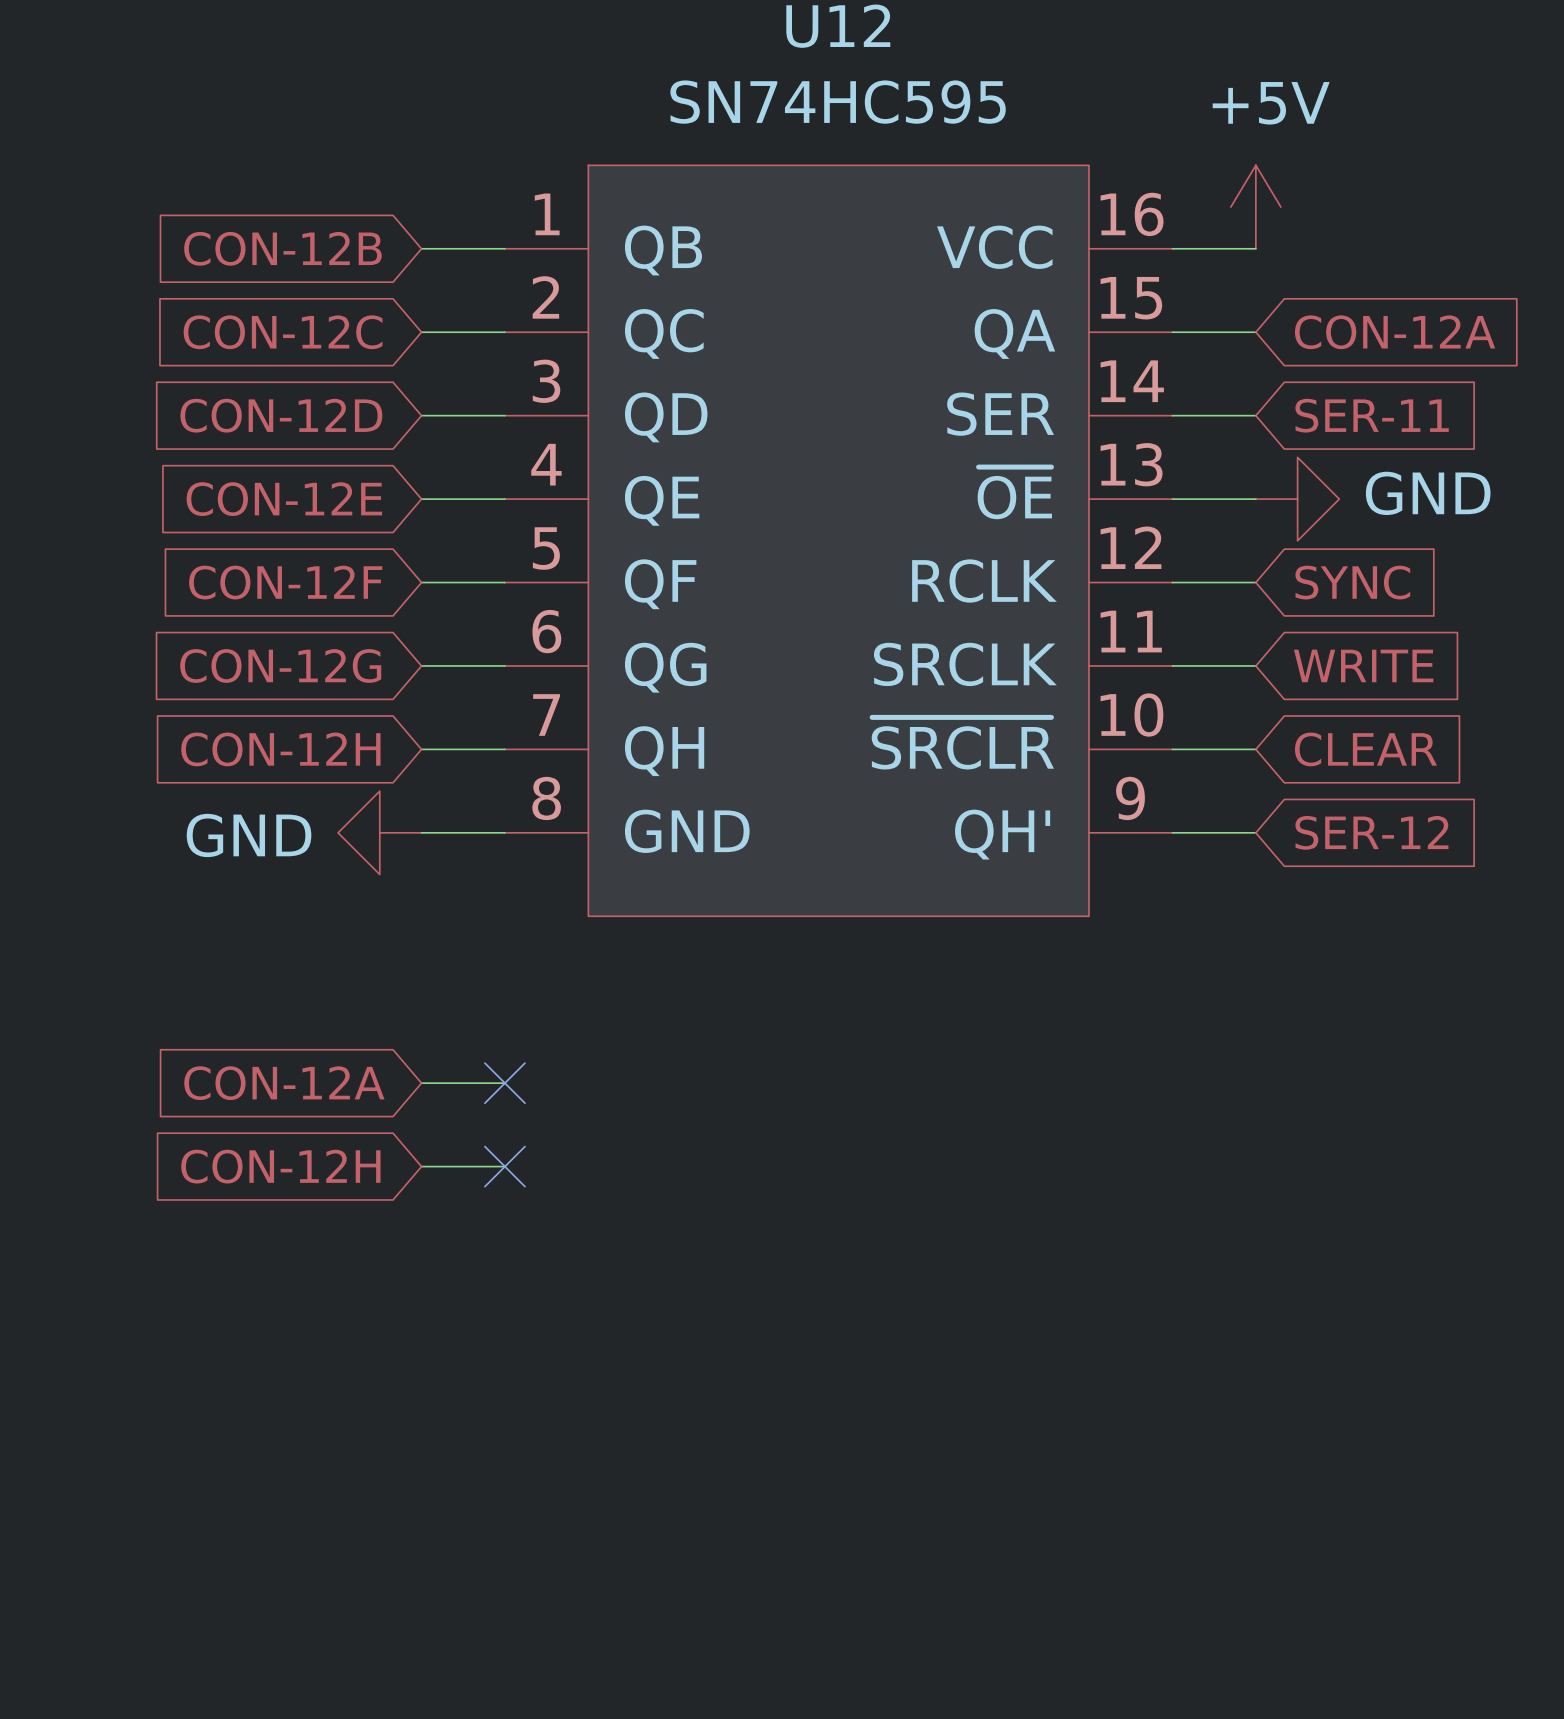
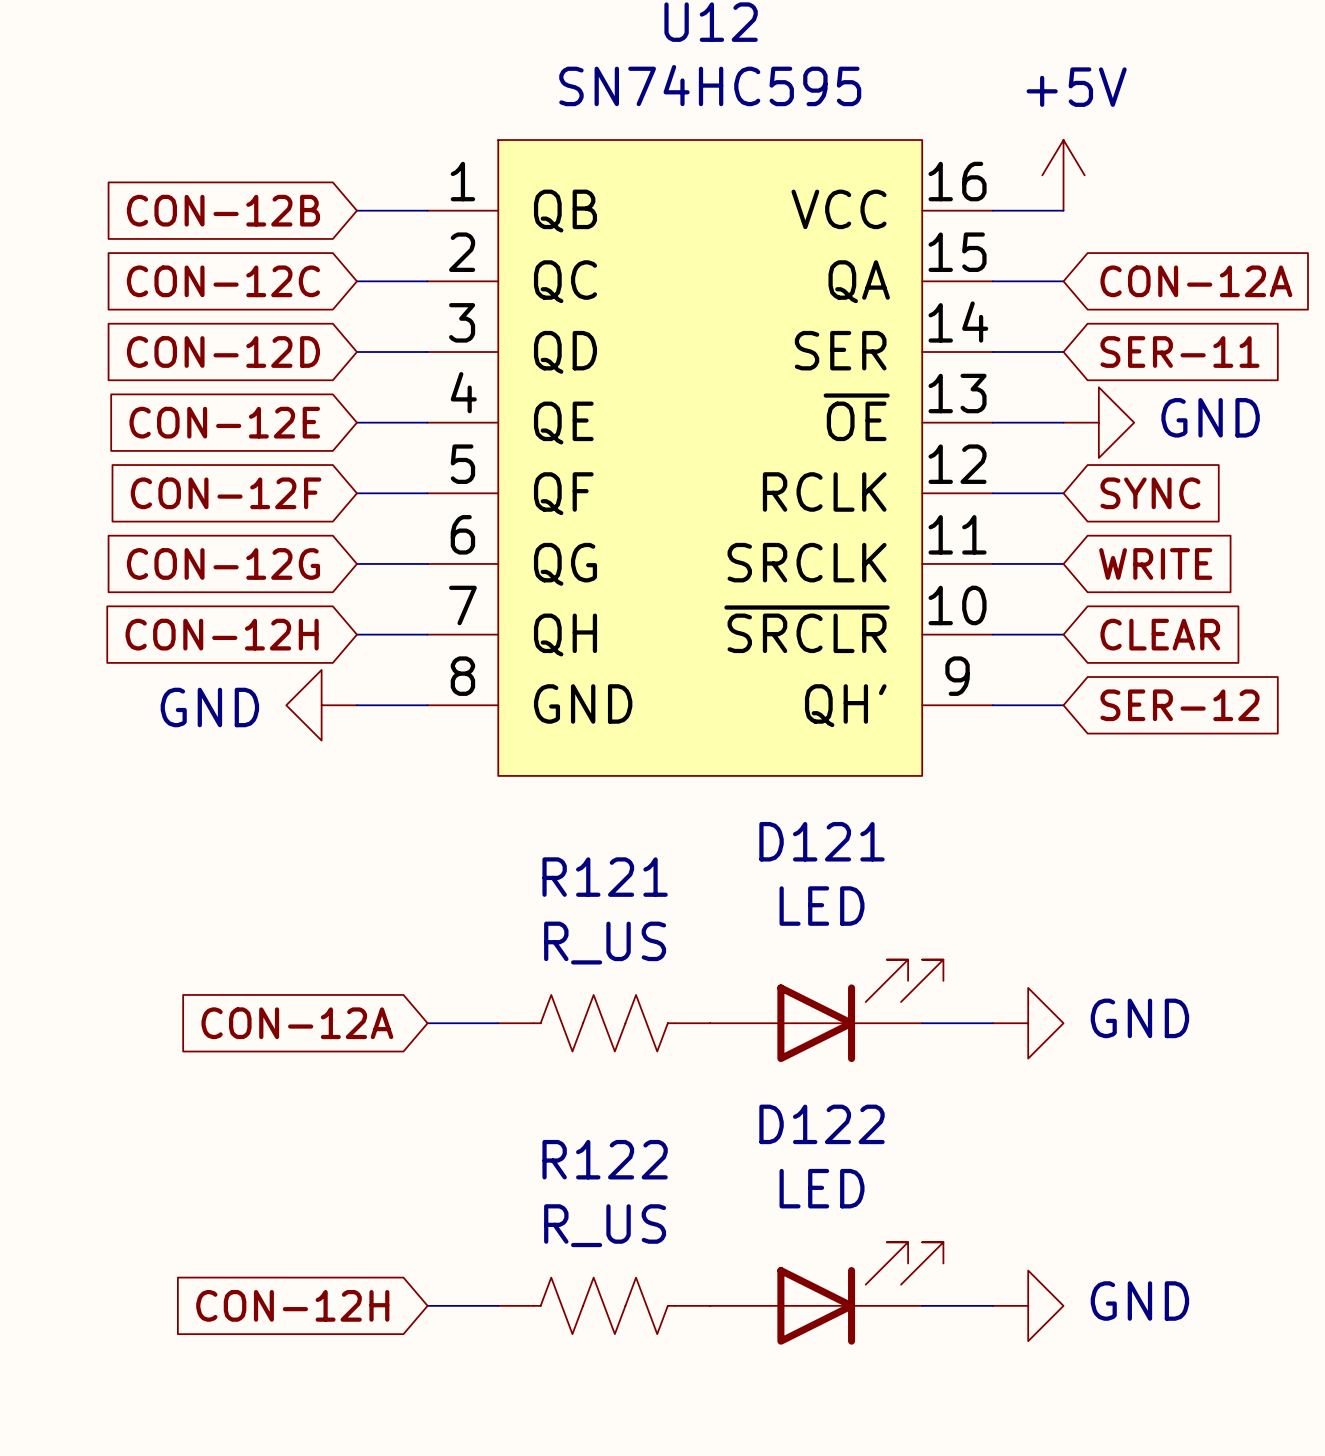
global label position: CON-12A (284, 1083) -> CON-12A (297, 1023)
wire: (421, 1083) (504, 1083) -> (427, 1305) (498, 1305)
no-connect mark: (504, 1083) -> none
global label position: CON-12H (280, 1166) -> CON-12H (292, 1305)
wire: (421, 1166) (504, 1166) -> (427, 1023) (498, 1023)
no-connect mark: (504, 1166) -> none
D121: none -> LED (826, 1010)
R121: none -> R_US (604, 1023)
wire: none -> (922, 1023) (992, 1023)
power symbol: none -> GND (1028, 1023)
D122: none -> LED (826, 1293)
R122: none -> R_US (604, 1305)
wire: none -> (922, 1305) (992, 1305)
power symbol: none -> GND (1028, 1305)

